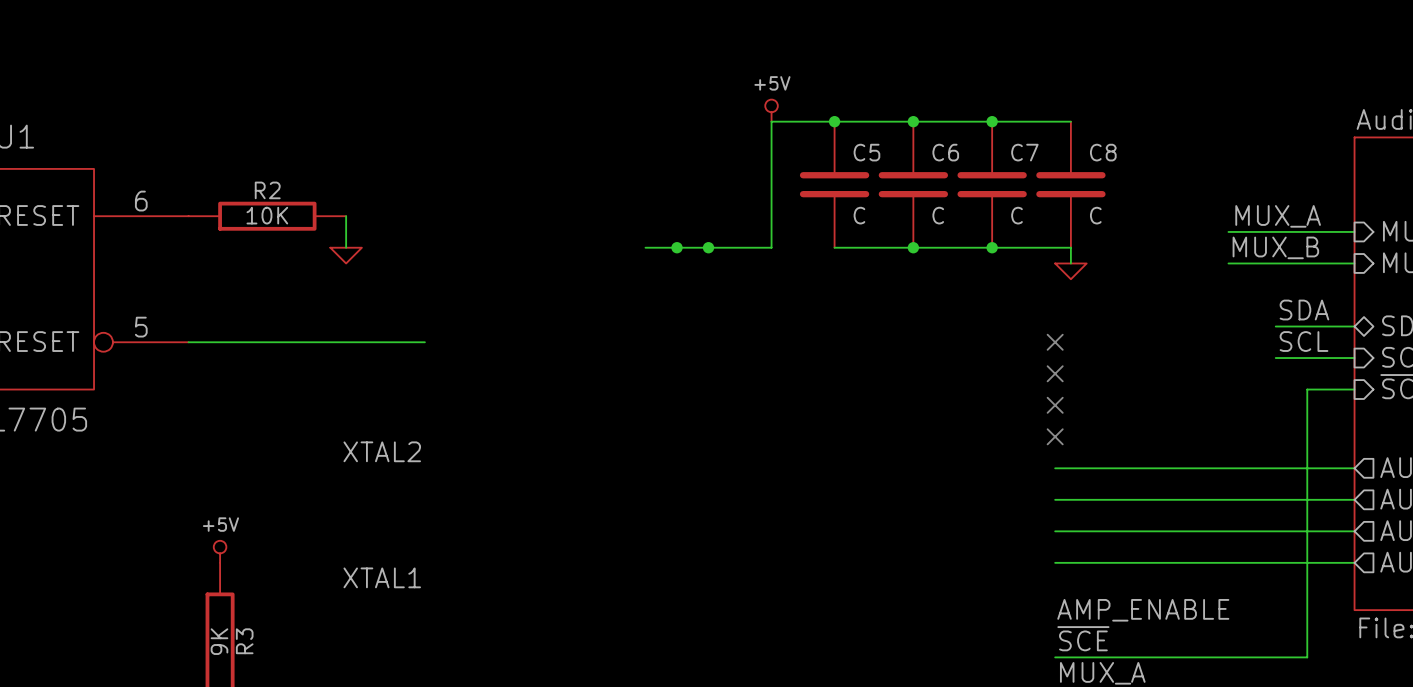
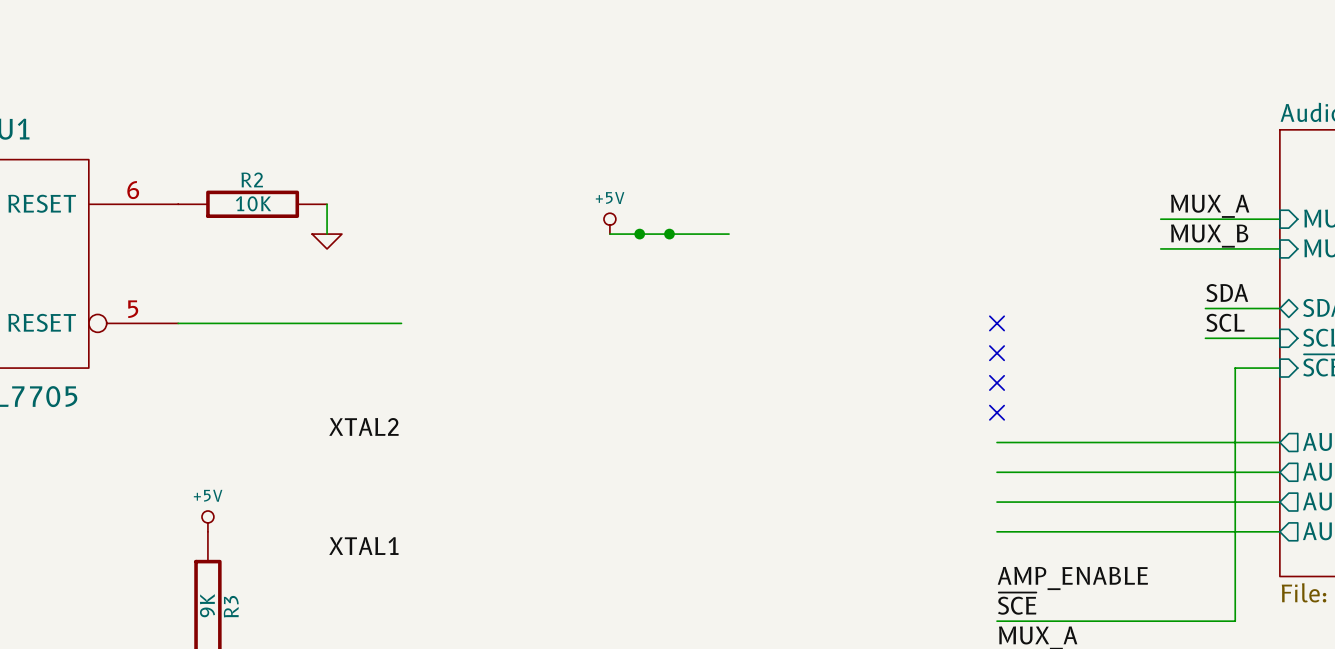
power symbol position: +5V (771, 110) -> +5V (609, 223)
junction: (834, 121) -> none
junction: (913, 121) -> none
junction: (992, 121) -> none
wire: (1070, 121) (771, 121) (771, 247) -> none
C5: C (834, 184) -> none
C6: C (913, 184) -> none
C7: C (992, 184) -> none
C8: C (1070, 184) -> none
wire: (834, 247) (1070, 247) (1070, 263) -> none
junction: (913, 247) -> none
junction: (992, 247) -> none
power symbol: (1070, 271) -> none

